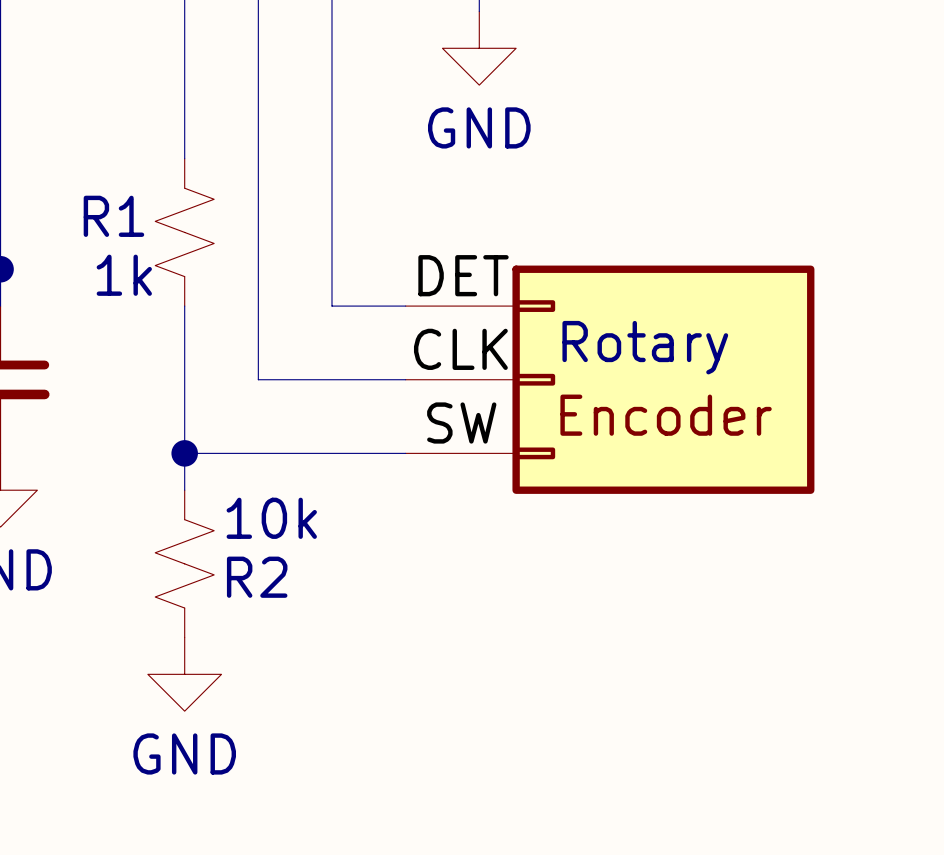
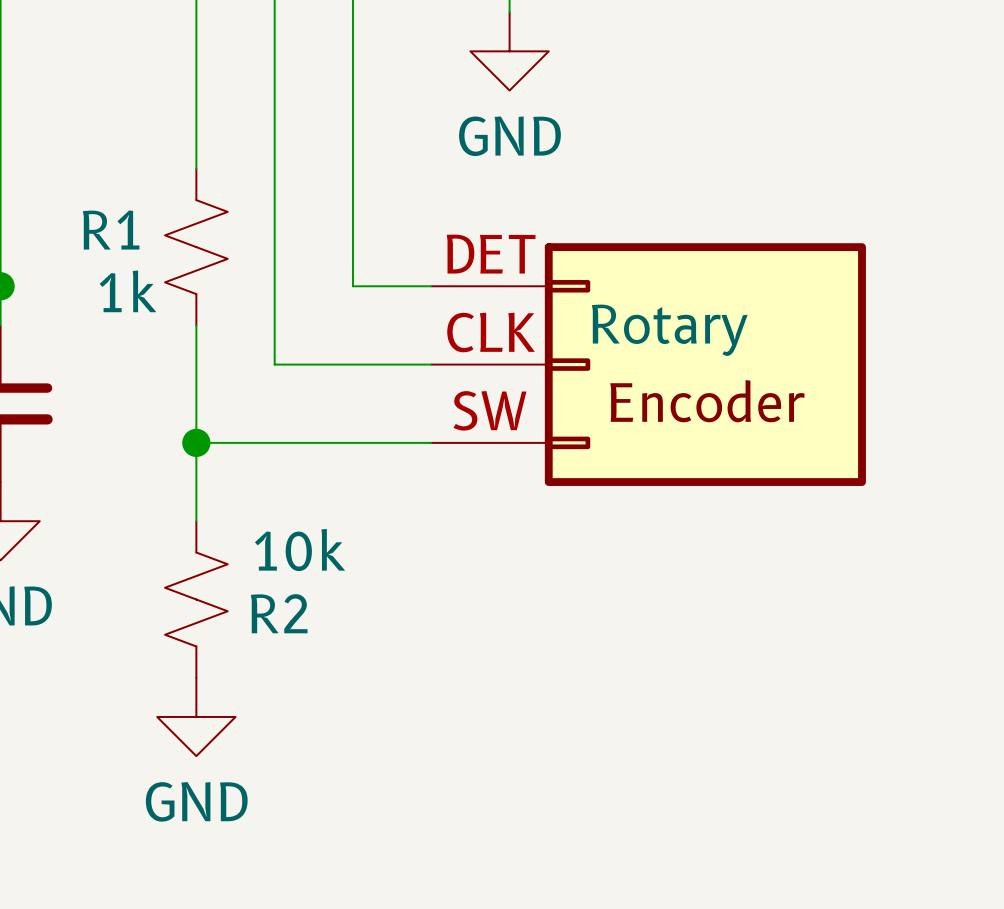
wire: (331, 269) (331, 306) (405, 306) -> (352, 286) (431, 286)
wire: (258, 342) (258, 379) (405, 379) -> (274, 364) (431, 364)
part position: (610, 379) -> (648, 364)
wire: (184, 453) (405, 453) -> (196, 442) (431, 442)
junction position: (184, 453) -> (196, 442)

